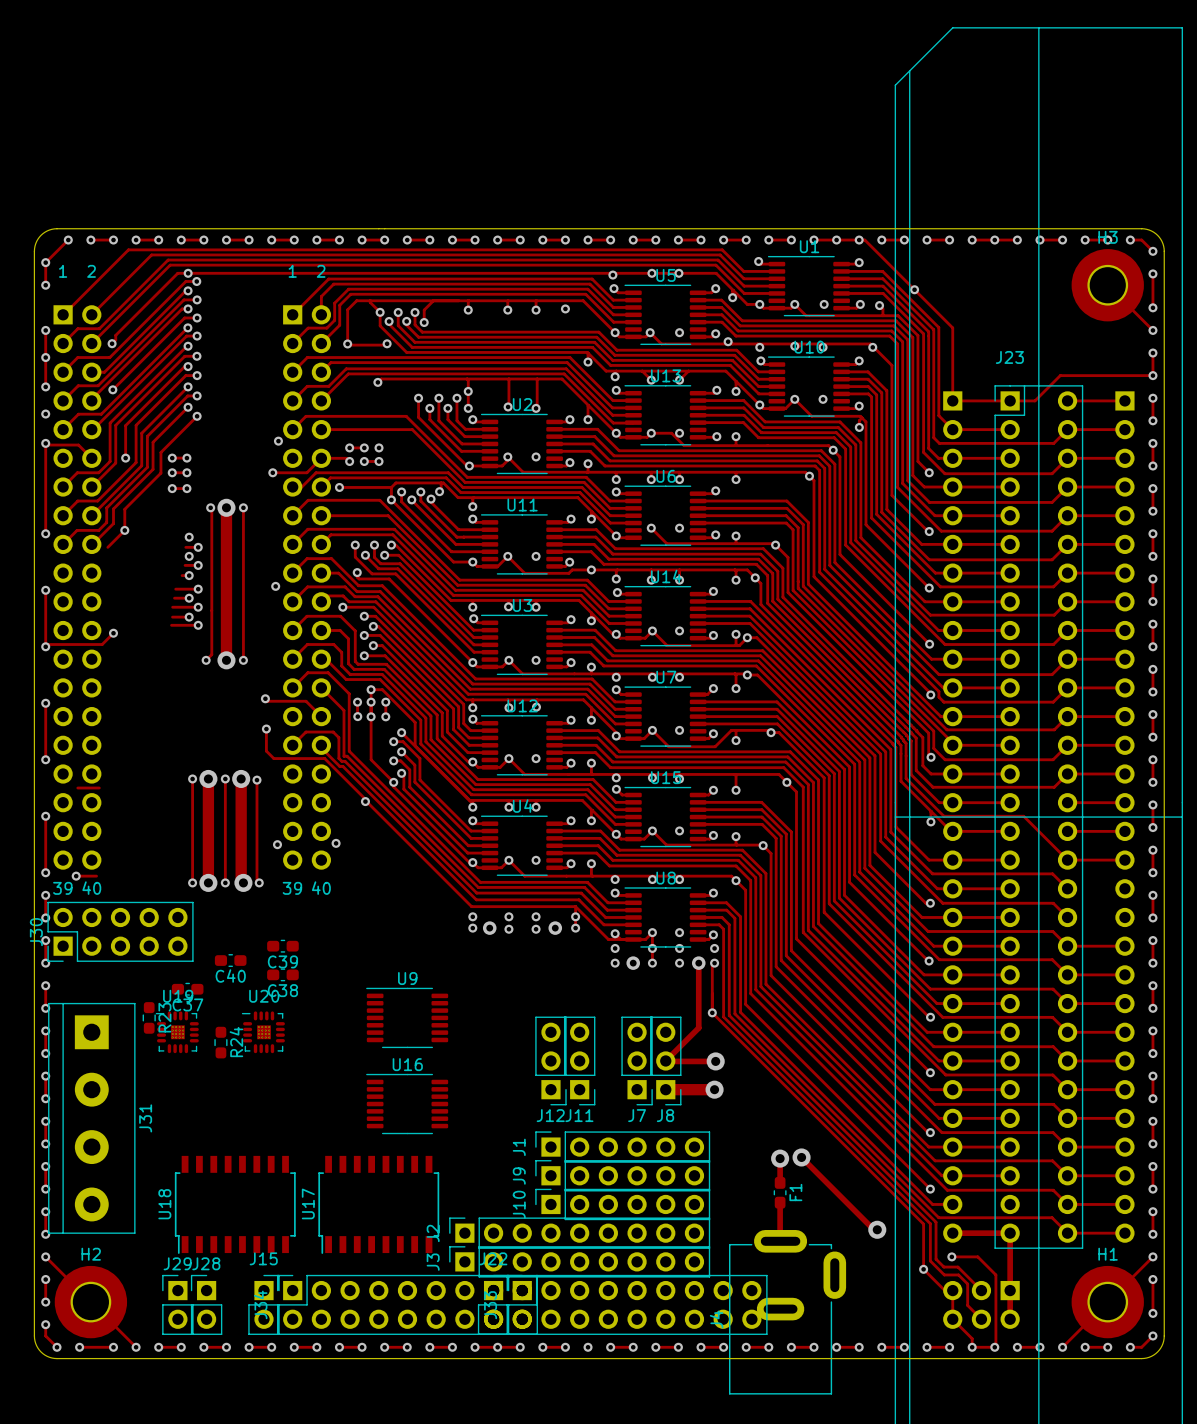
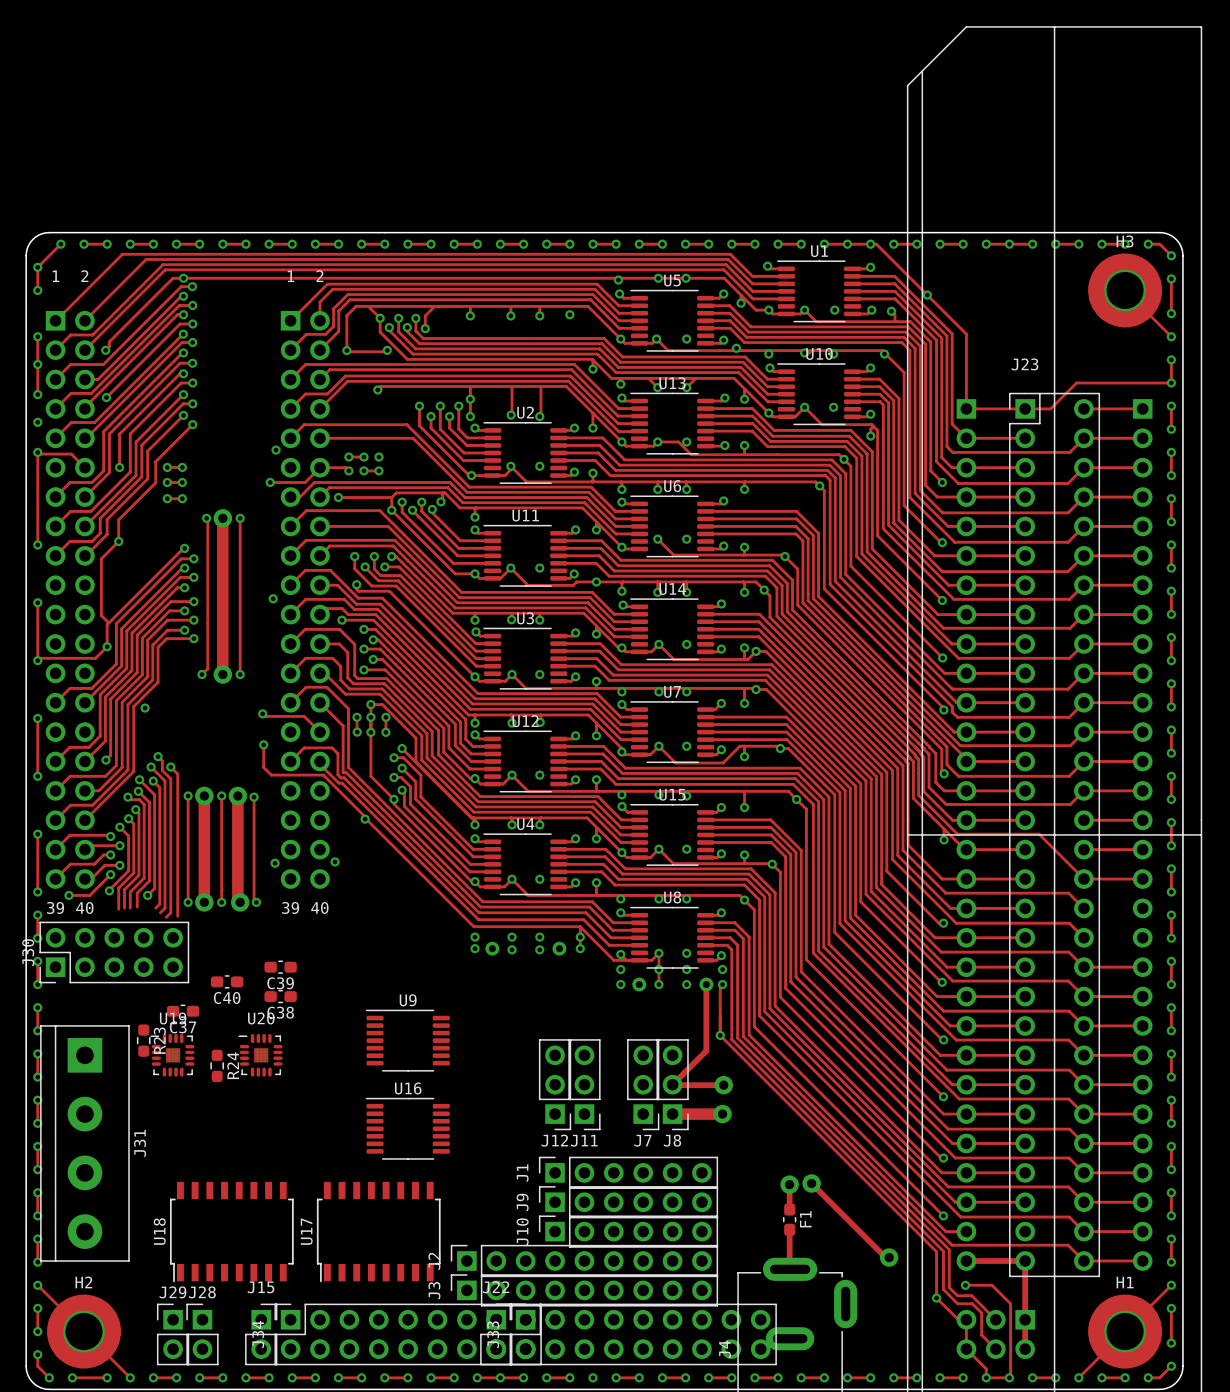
track: none -> (183, 548) (107, 624) (107, 646)
track: none -> (101, 558) (101, 615) (108, 622)
track: none -> (181, 558) (116, 623) (116, 663) (91, 688) (69, 688) (55, 702)
track: none -> (182, 568) (121, 628) (121, 666) (84, 702)
track: none -> (180, 577) (126, 630) (126, 668) (100, 694) (100, 736) (88, 747) (69, 747) (55, 761)
track: none -> (177, 587) (132, 633) (132, 670) (105, 696) (105, 741) (84, 761)
track: none -> (170, 601) (137, 635) (137, 672) (110, 699) (110, 755) (105, 760)
track: none -> (169, 610) (142, 638) (142, 674) (116, 700) (116, 765) (105, 776) (70, 776) (55, 790)
track: none -> (167, 620) (147, 640) (147, 676) (122, 702) (122, 767) (98, 790) (84, 790)
track: none -> (167, 630) (152, 645) (152, 679) (127, 704) (127, 769) (92, 805)
track: none -> (166, 638) (158, 647) (158, 682) (133, 706) (133, 771) (84, 820)
via: none -> (145, 708)
track: none -> (158, 756) (162, 760) (162, 770) (170, 778) (170, 912) (166, 917)
via: none -> (158, 756)
via: none -> (105, 760)
track: none -> (151, 767) (164, 780) (164, 908) (160, 912)
via: none -> (151, 767)
track: none -> (170, 767) (177, 773) (177, 916)
via: none -> (170, 767)
track: none -> (139, 779) (154, 794) (154, 888) (147, 895)
via: none -> (139, 779)
track: none -> (153, 781) (159, 787) (159, 904) (155, 908)
via: none -> (153, 781)
track: none -> (138, 791) (149, 802) (149, 880) (137, 893) (137, 907)
via: none -> (138, 791)
track: none -> (127, 797) (130, 799) (139, 799) (144, 804) (144, 878) (130, 891) (130, 908)
via: none -> (127, 797)
track: none -> (70, 805) (55, 820)
track: none -> (135, 809) (138, 812) (138, 875) (124, 889) (124, 908)
via: none -> (135, 809)
track: none -> (128, 818) (133, 823) (133, 873) (118, 888) (118, 909)
via: none -> (128, 818)
track: none -> (119, 827) (128, 835) (128, 870) (109, 890)
via: none -> (119, 827)
track: none -> (110, 836) (69, 835) (55, 849)
via: none -> (110, 836)
track: none -> (88, 845) (119, 845)
via: none -> (119, 845)
track: none -> (110, 854) (103, 854) (94, 864) (70, 864) (55, 879)
via: none -> (110, 854)
track: none -> (119, 865) (104, 865) (91, 879)
via: none -> (119, 865)
track: none -> (110, 874) (89, 895)
via: none -> (110, 874)
via: none -> (109, 890)
via: none -> (147, 895)

